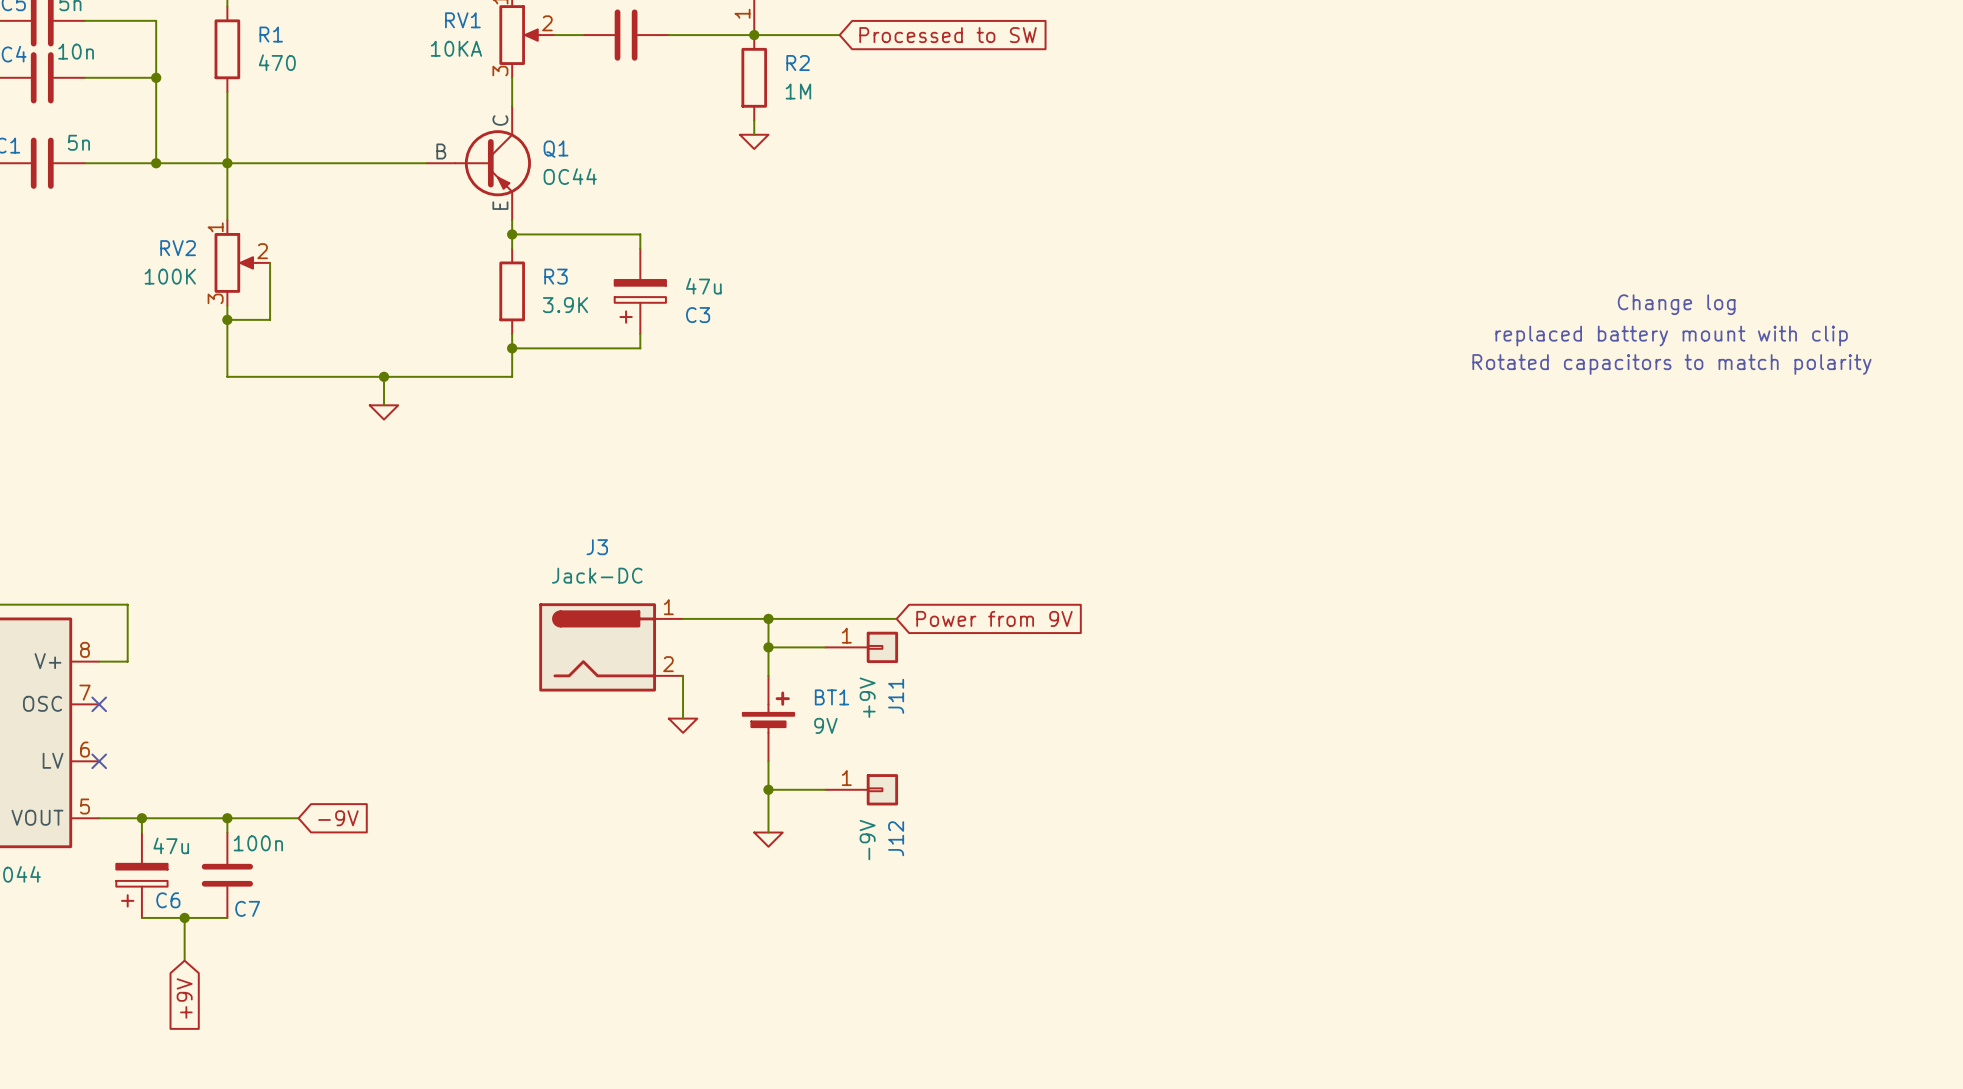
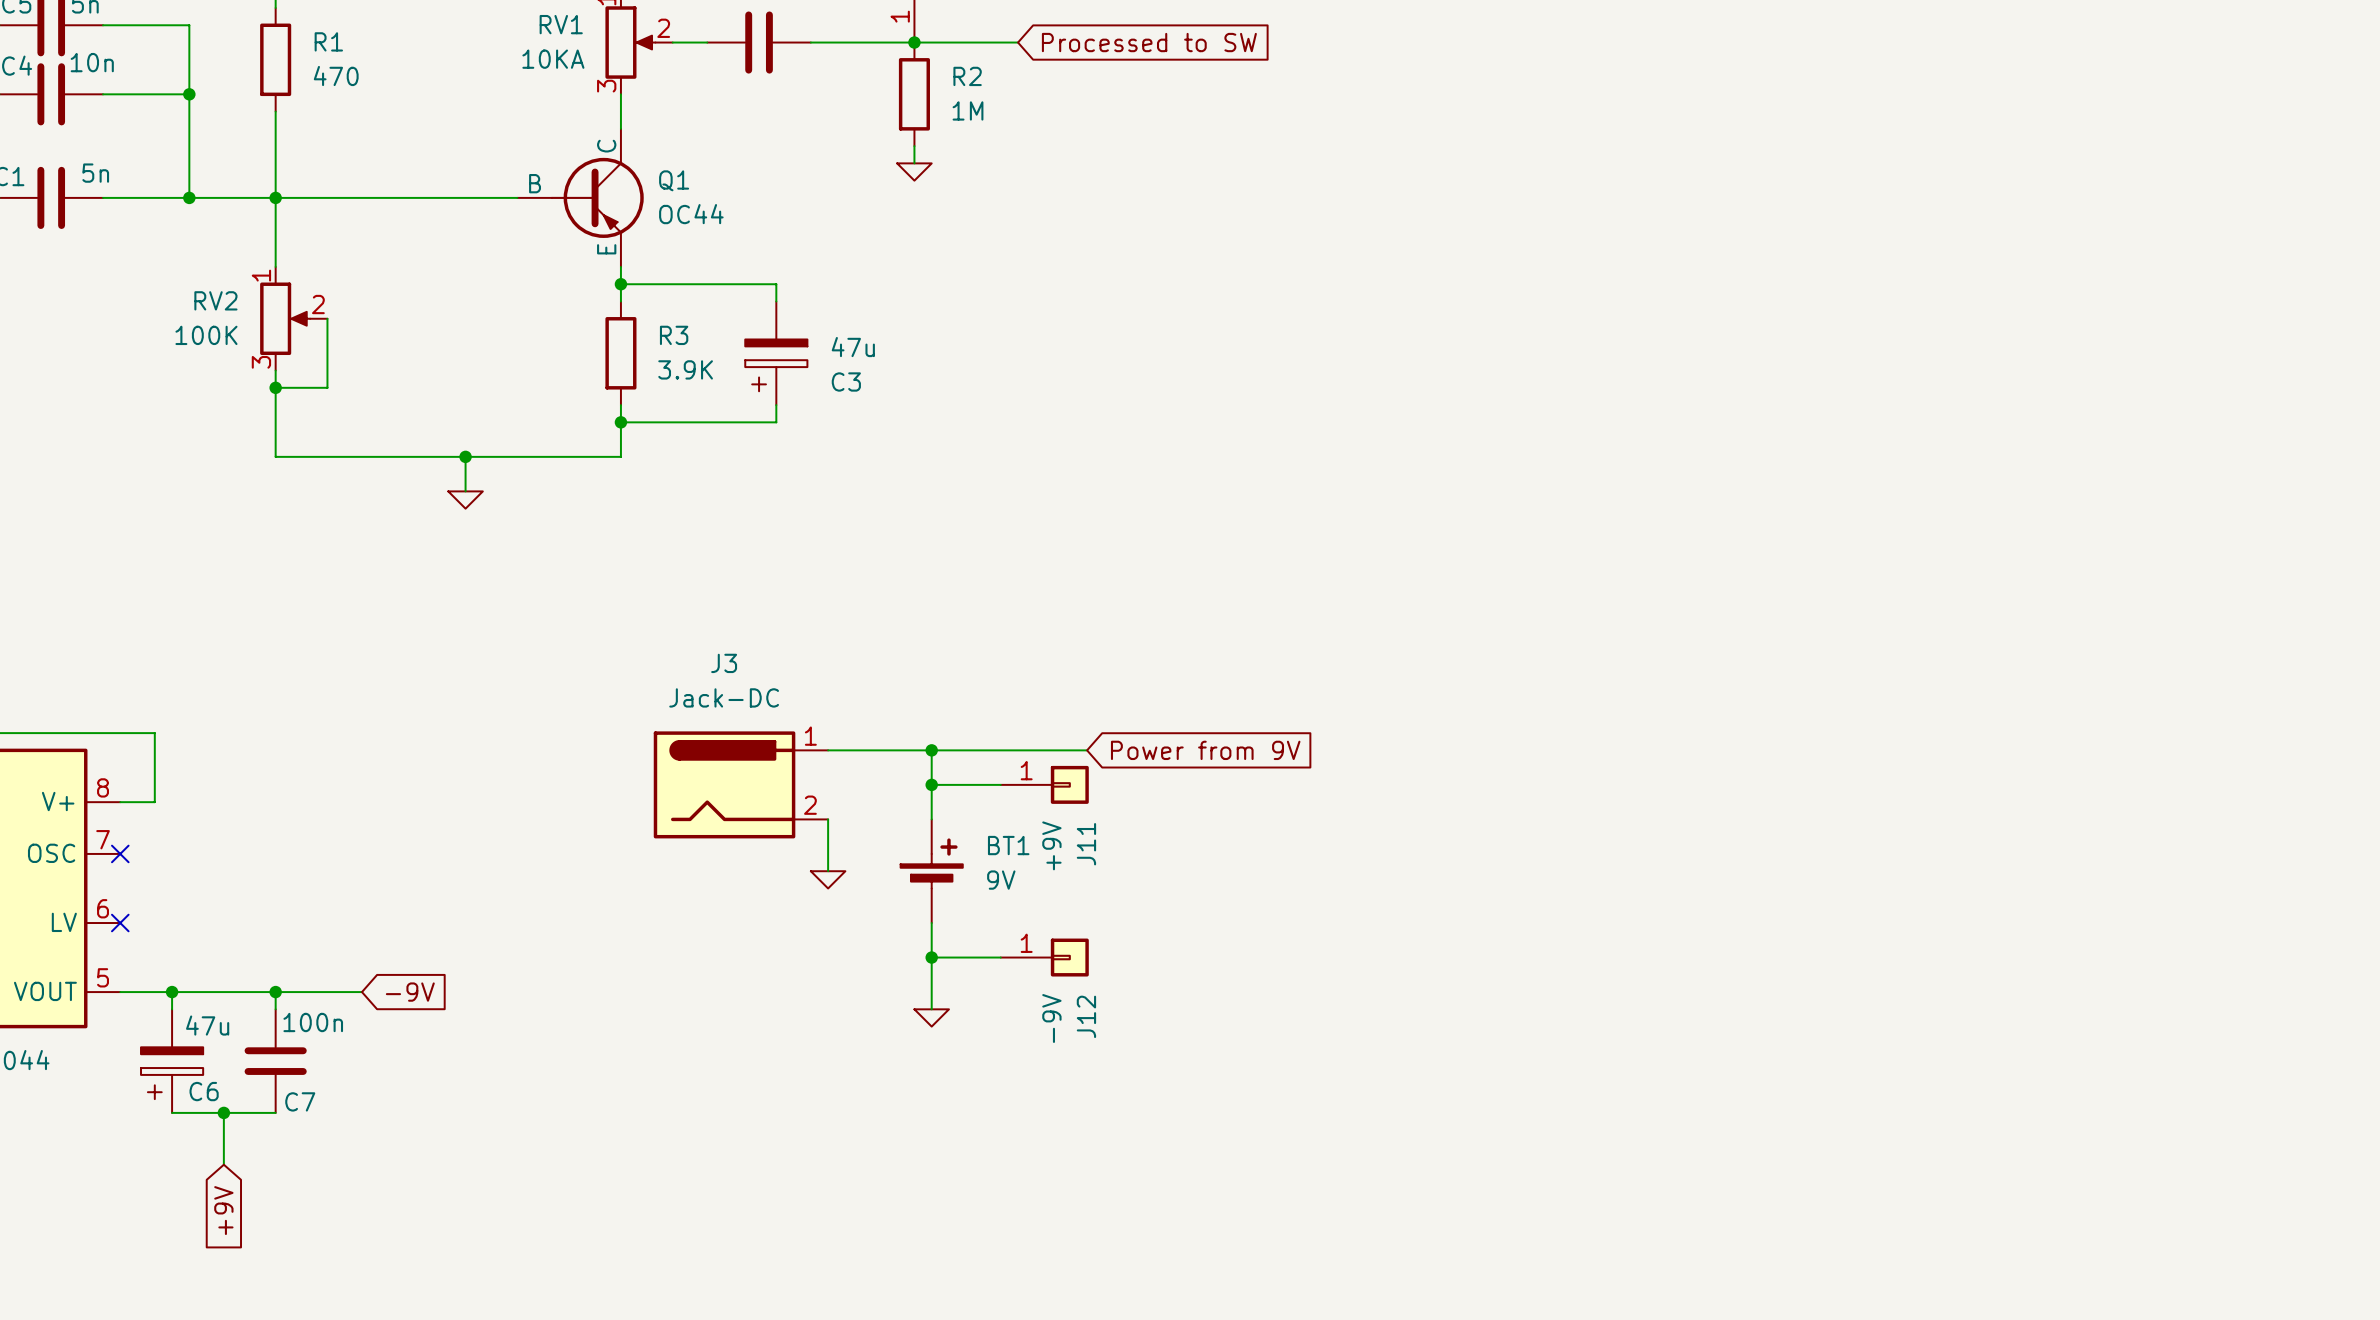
text: Change log (1676, 304) -> none
text: replaced battery mount with clip (1671, 336) -> none
text: Rotated capacitors to match polarity (1671, 364) -> none

